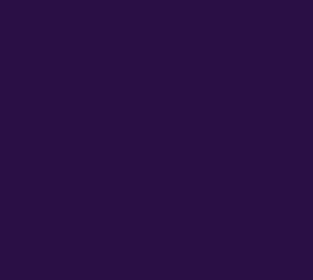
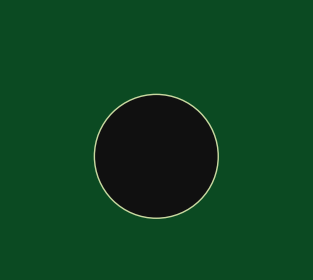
part: none -> (156, 156)

